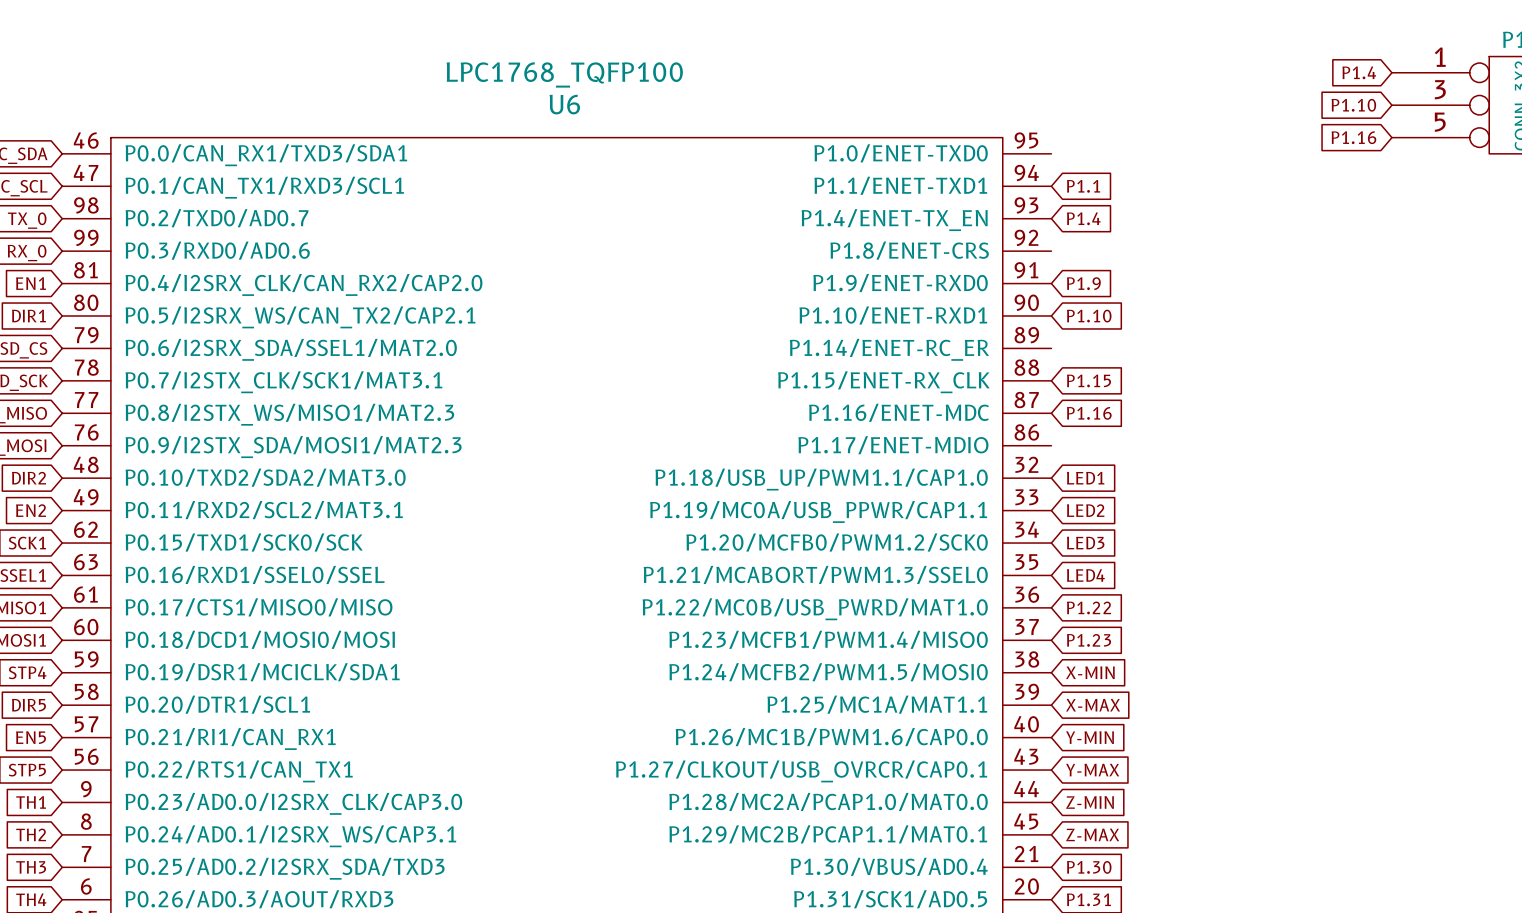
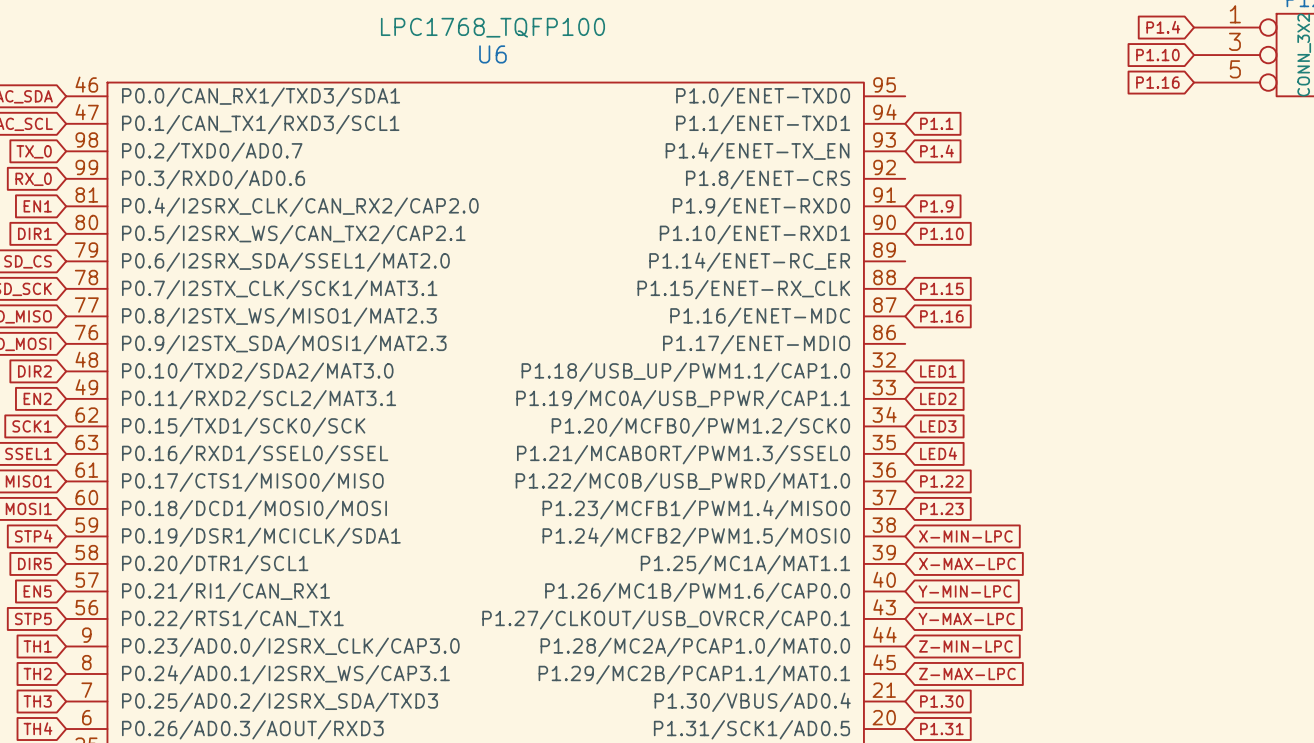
global label: X-MIN (1090, 672) -> X-MIN-LPC (965, 536)
global label: X-MAX (1093, 705) -> X-MAX-LPC (967, 563)
global label: Y-MIN (1089, 737) -> Y-MIN-LPC (965, 591)
global label: Y-MAX (1092, 770) -> Y-MAX-LPC (966, 618)
global label: Z-MIN (1090, 802) -> Z-MIN-LPC (965, 646)
global label: Z-MAX (1092, 834) -> Z-MAX-LPC (967, 673)

